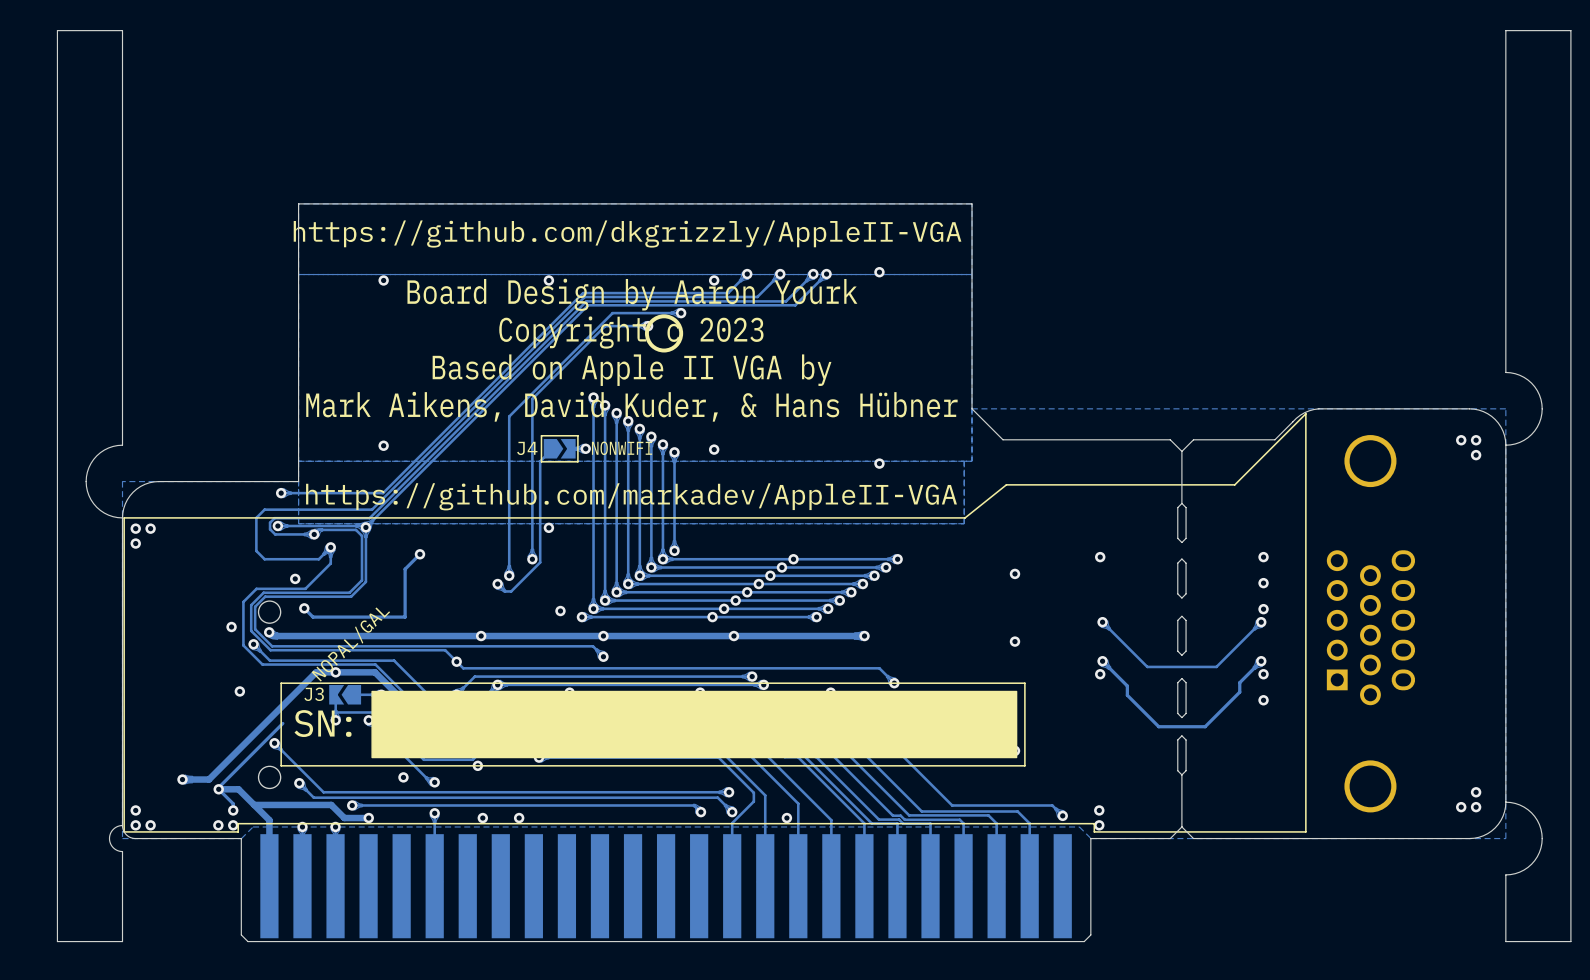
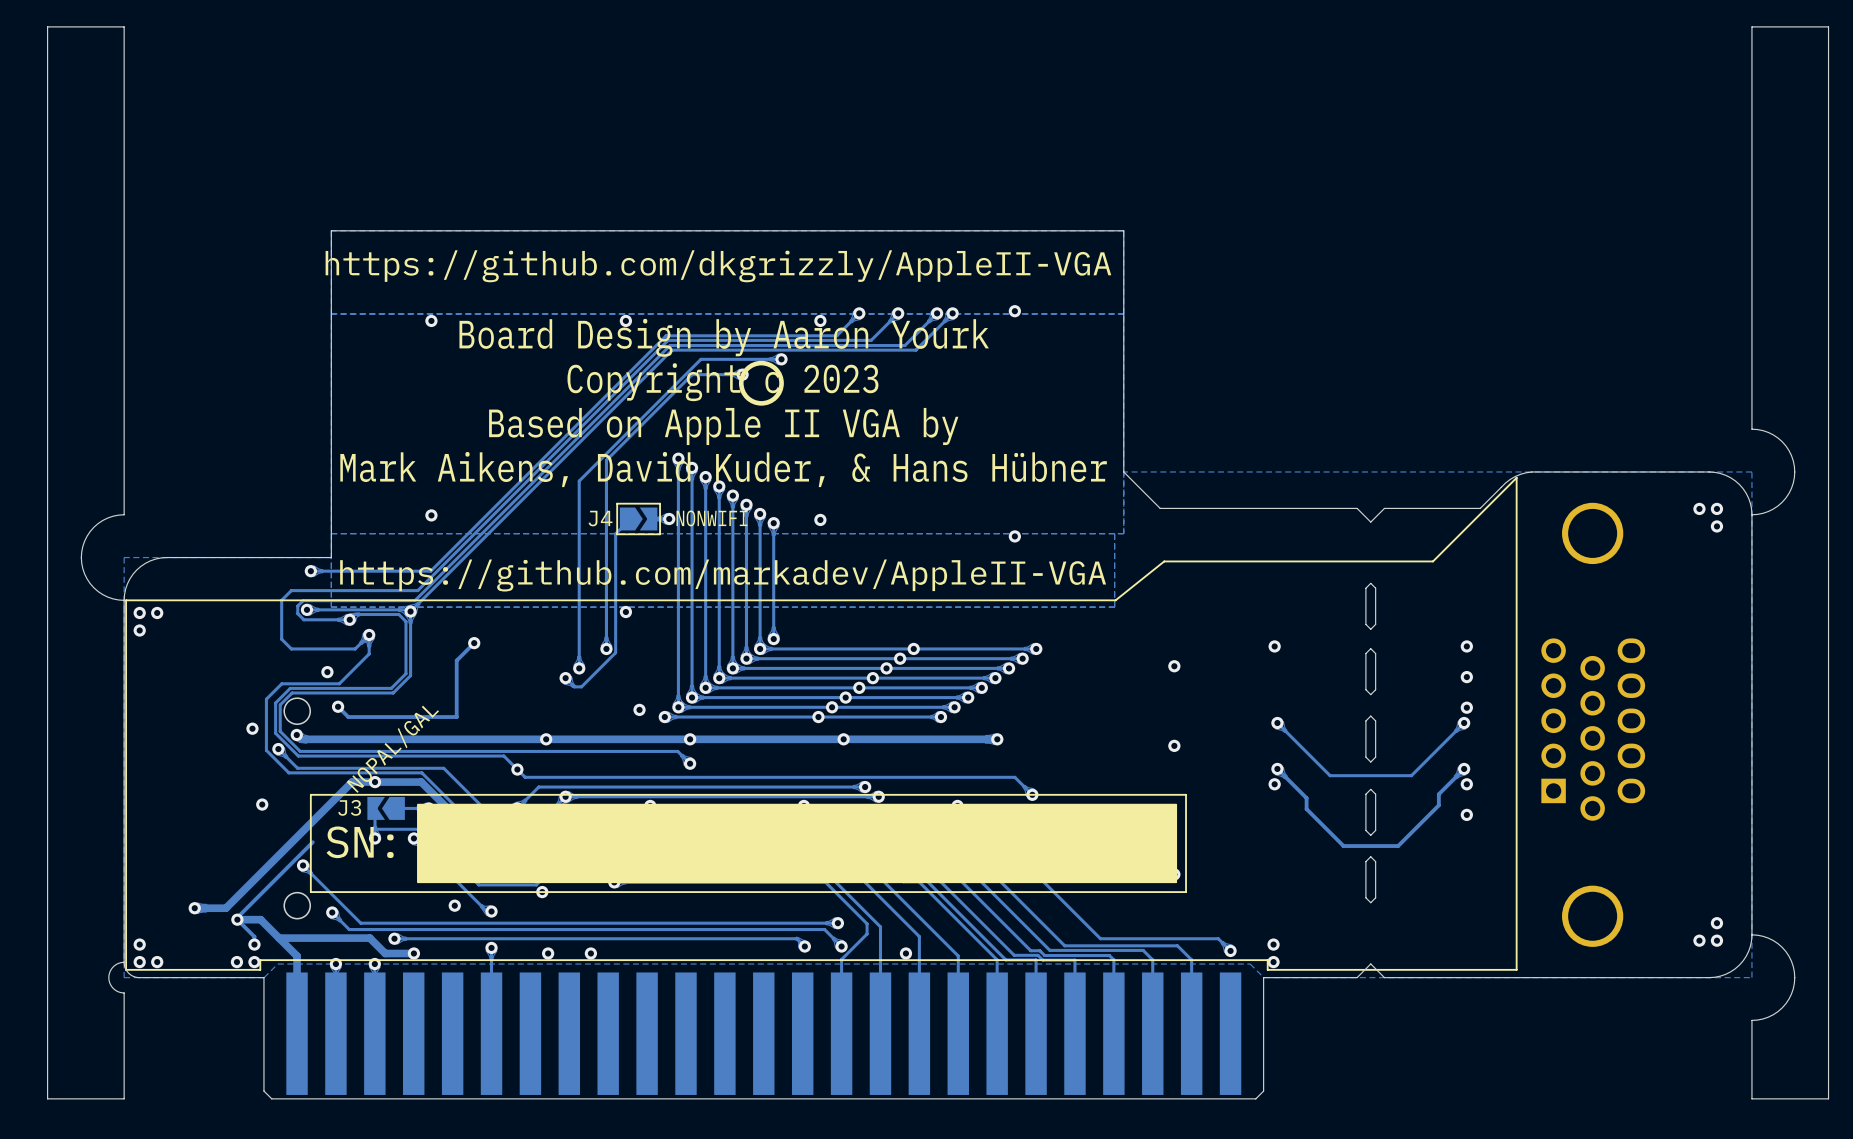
board edge: (1181, 451) (1181, 503) -> none
board edge: (1181, 774) (1181, 826) -> none

